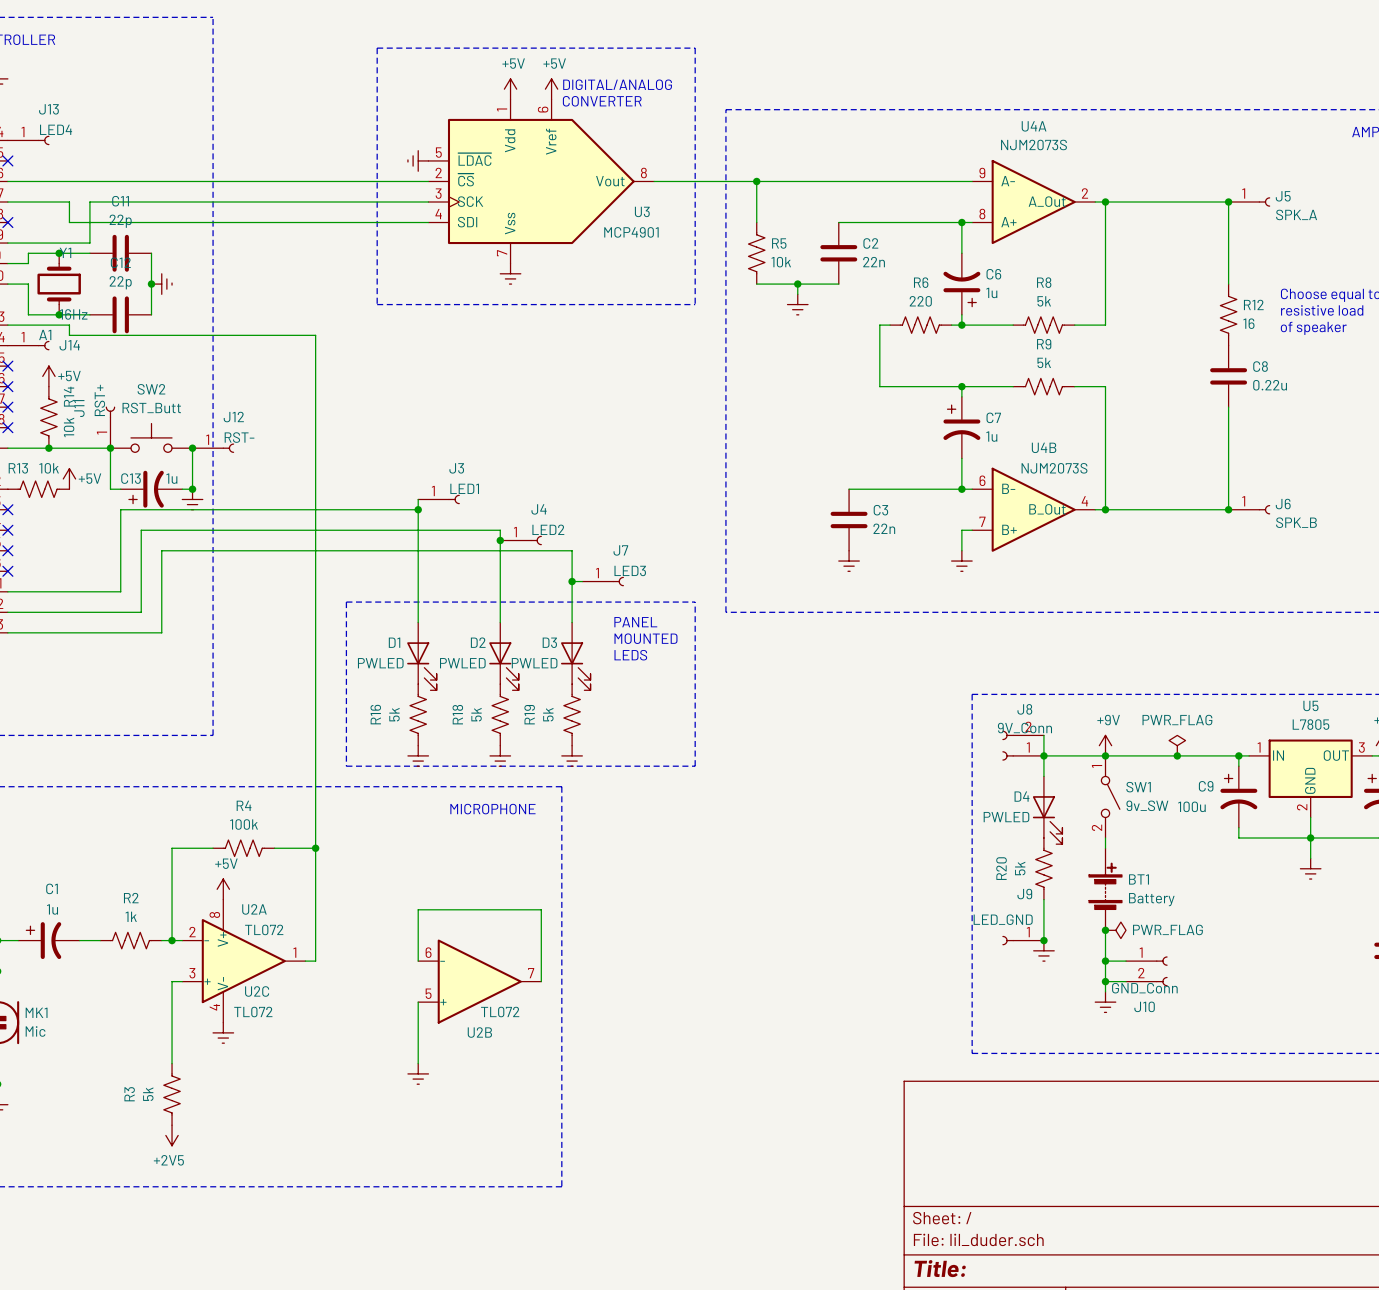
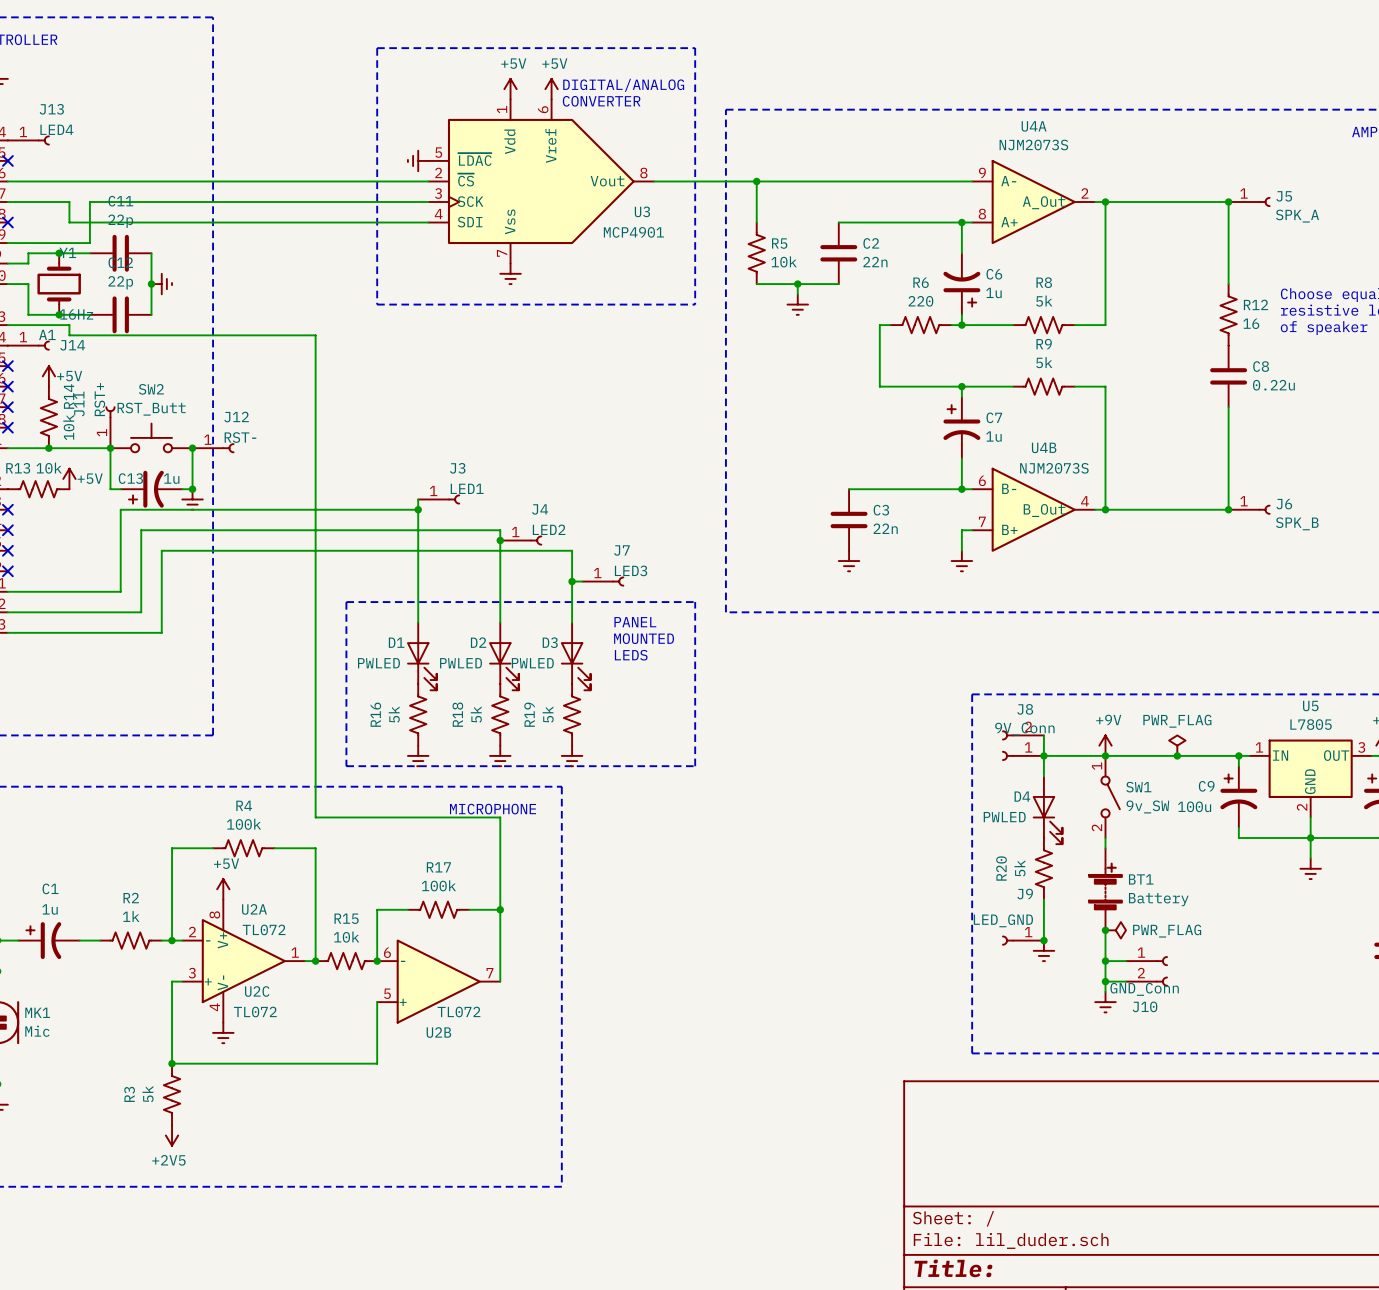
wire: (315, 817) (315, 848) -> (315, 817) (500, 817) (500, 981)
junction: (315, 848) -> none
wire: none -> (407, 909) (377, 909) (377, 961)
R17: none -> 100k (438, 909)
wire: (469, 909) (418, 909) (418, 961) -> none
wire: (500, 909) (541, 909) (541, 981) -> none
junction: none -> (500, 909)
junction: none -> (315, 961)
R15: none -> 10k (346, 961)
junction: none -> (377, 961)
U2B position: (479, 981) -> (438, 981)
wire: none -> (377, 1002) (377, 1063) (172, 1063)
wire: (418, 1002) (418, 1063) -> none
junction: none -> (172, 1063)
power symbol: (418, 1073) -> none

